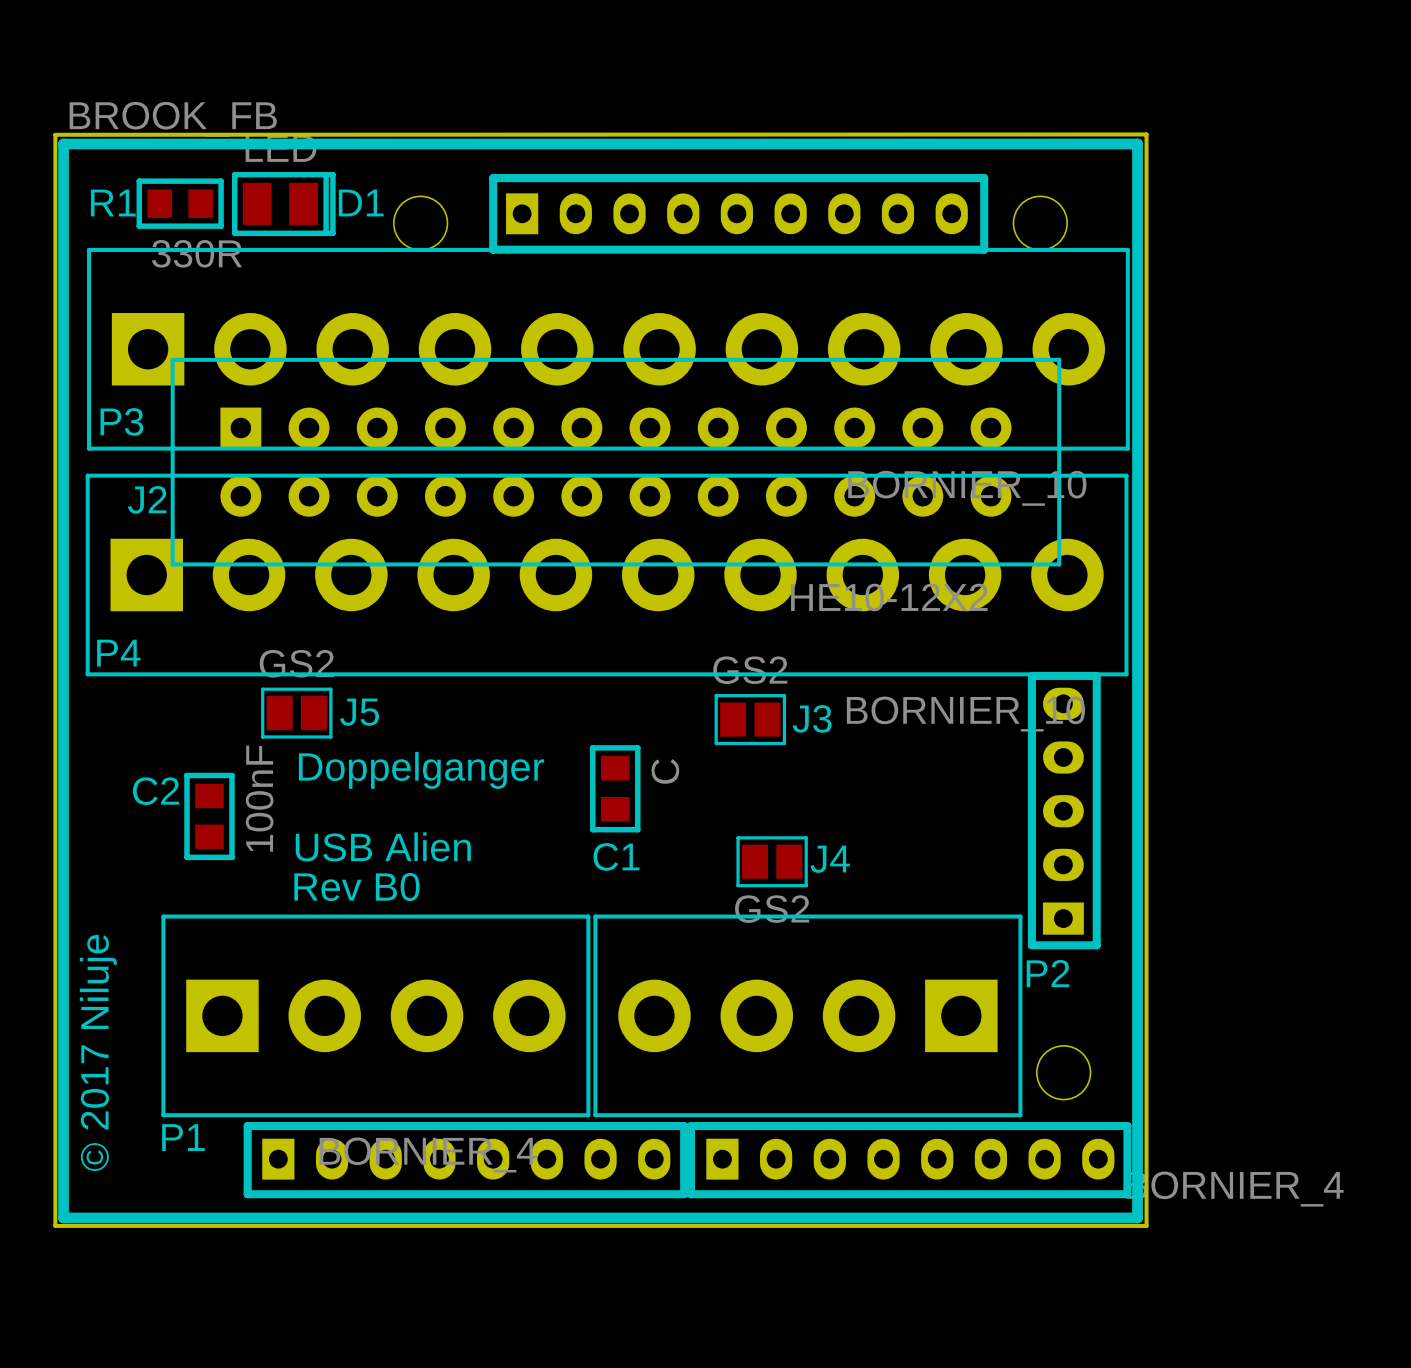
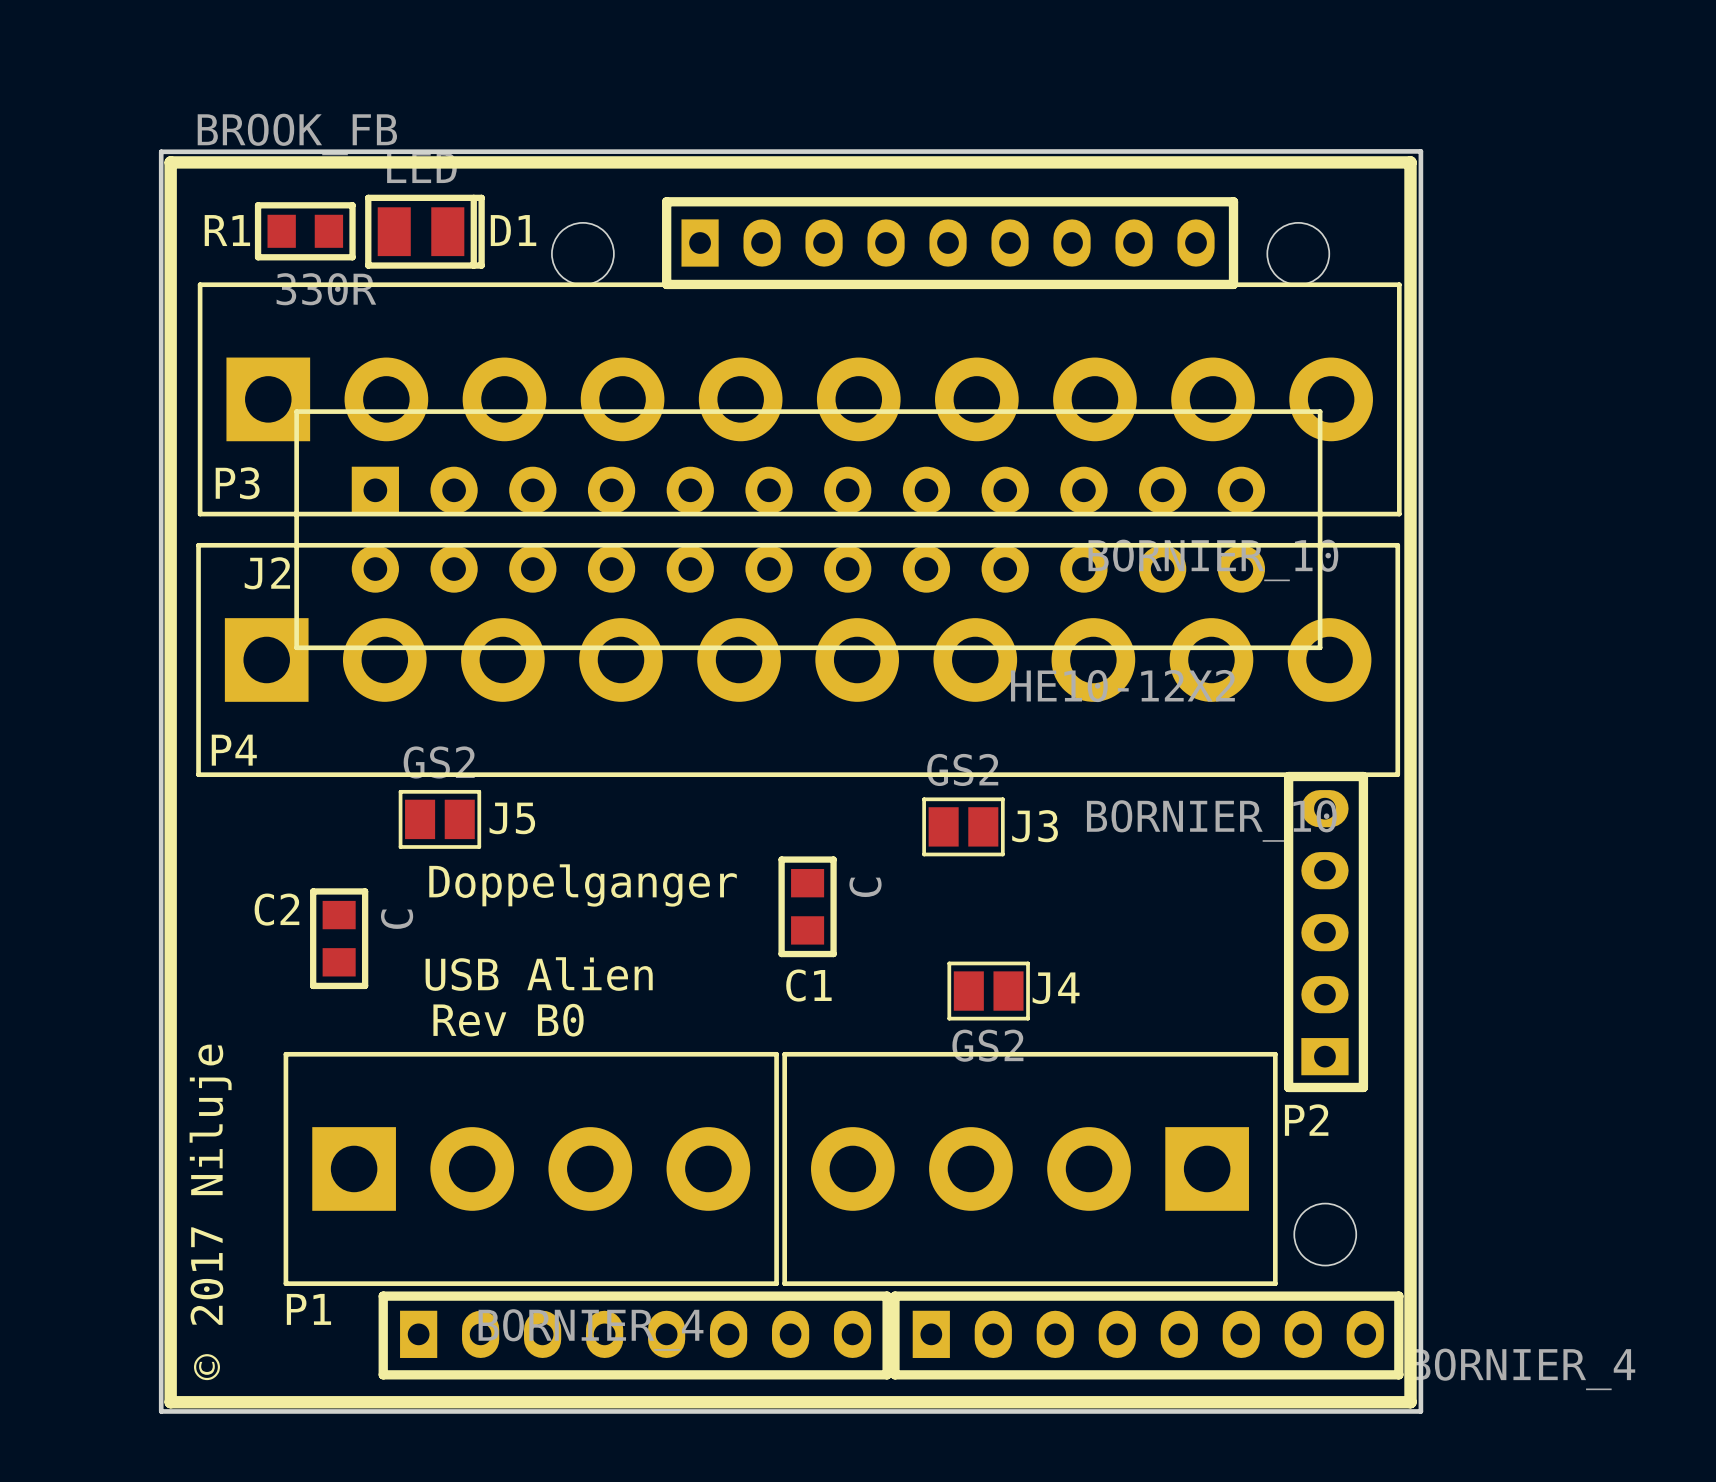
C2 value: 100nF (259, 798) -> C (397, 919)

